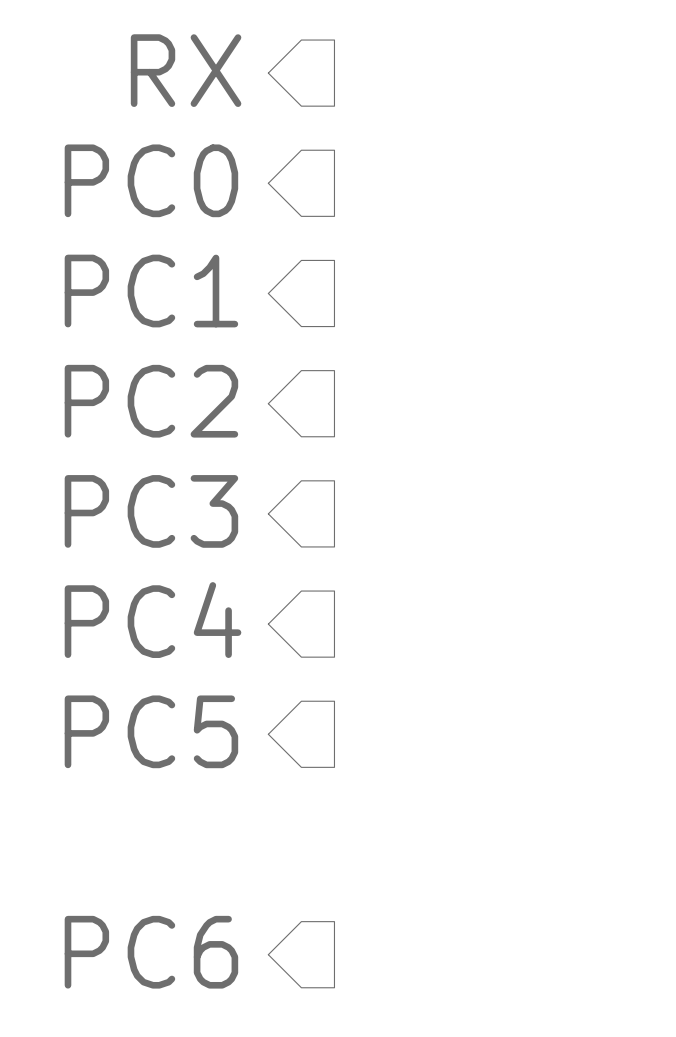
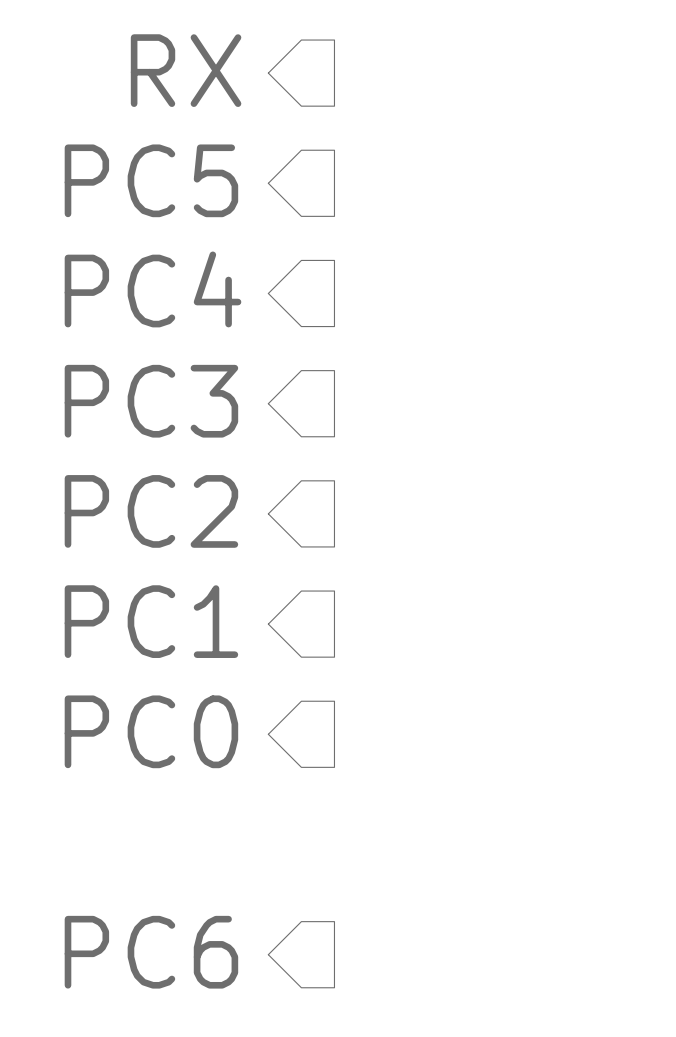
sheet pin: PC0 (151, 180) -> PC5 (151, 180)
sheet pin: PC1 (151, 291) -> PC4 (153, 289)
sheet pin: PC2 (151, 401) -> PC3 (151, 401)
sheet pin: PC3 (151, 511) -> PC2 (151, 511)
sheet pin: PC4 (153, 620) -> PC1 (151, 621)
sheet pin: PC5 (151, 731) -> PC0 (151, 731)

